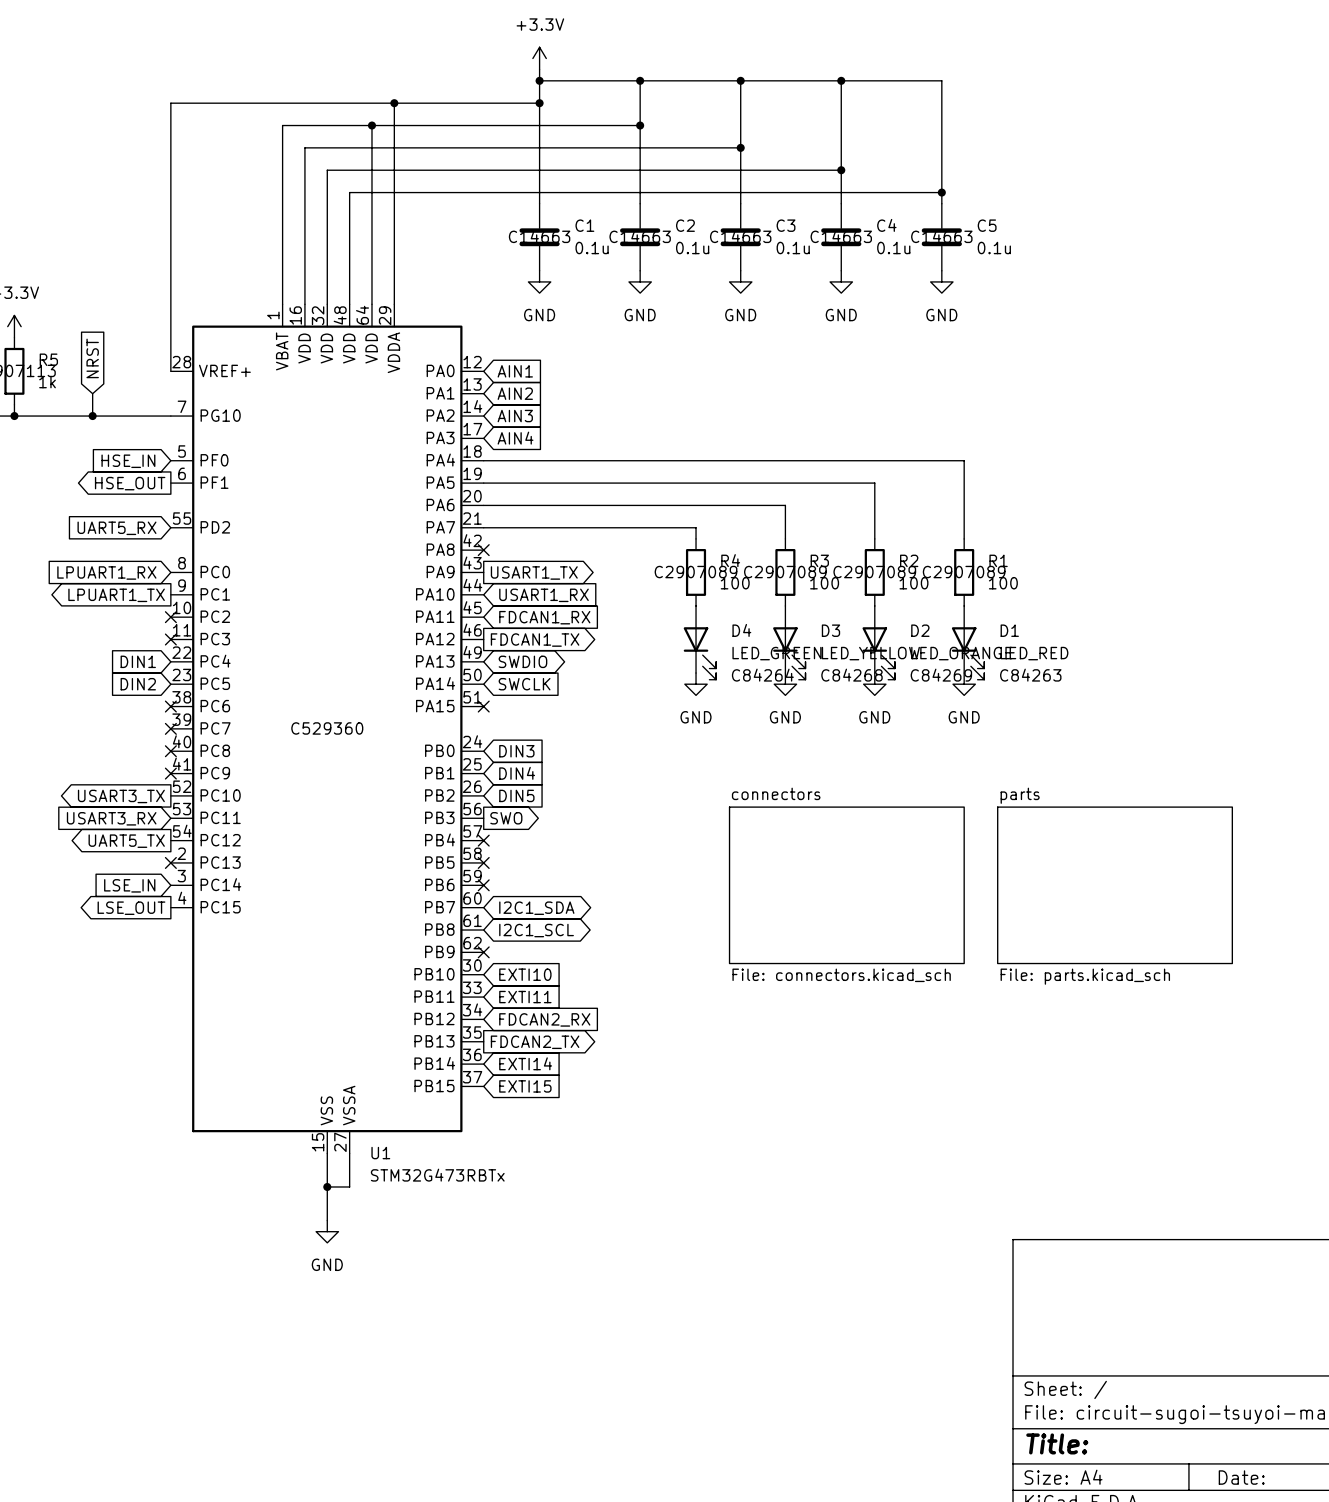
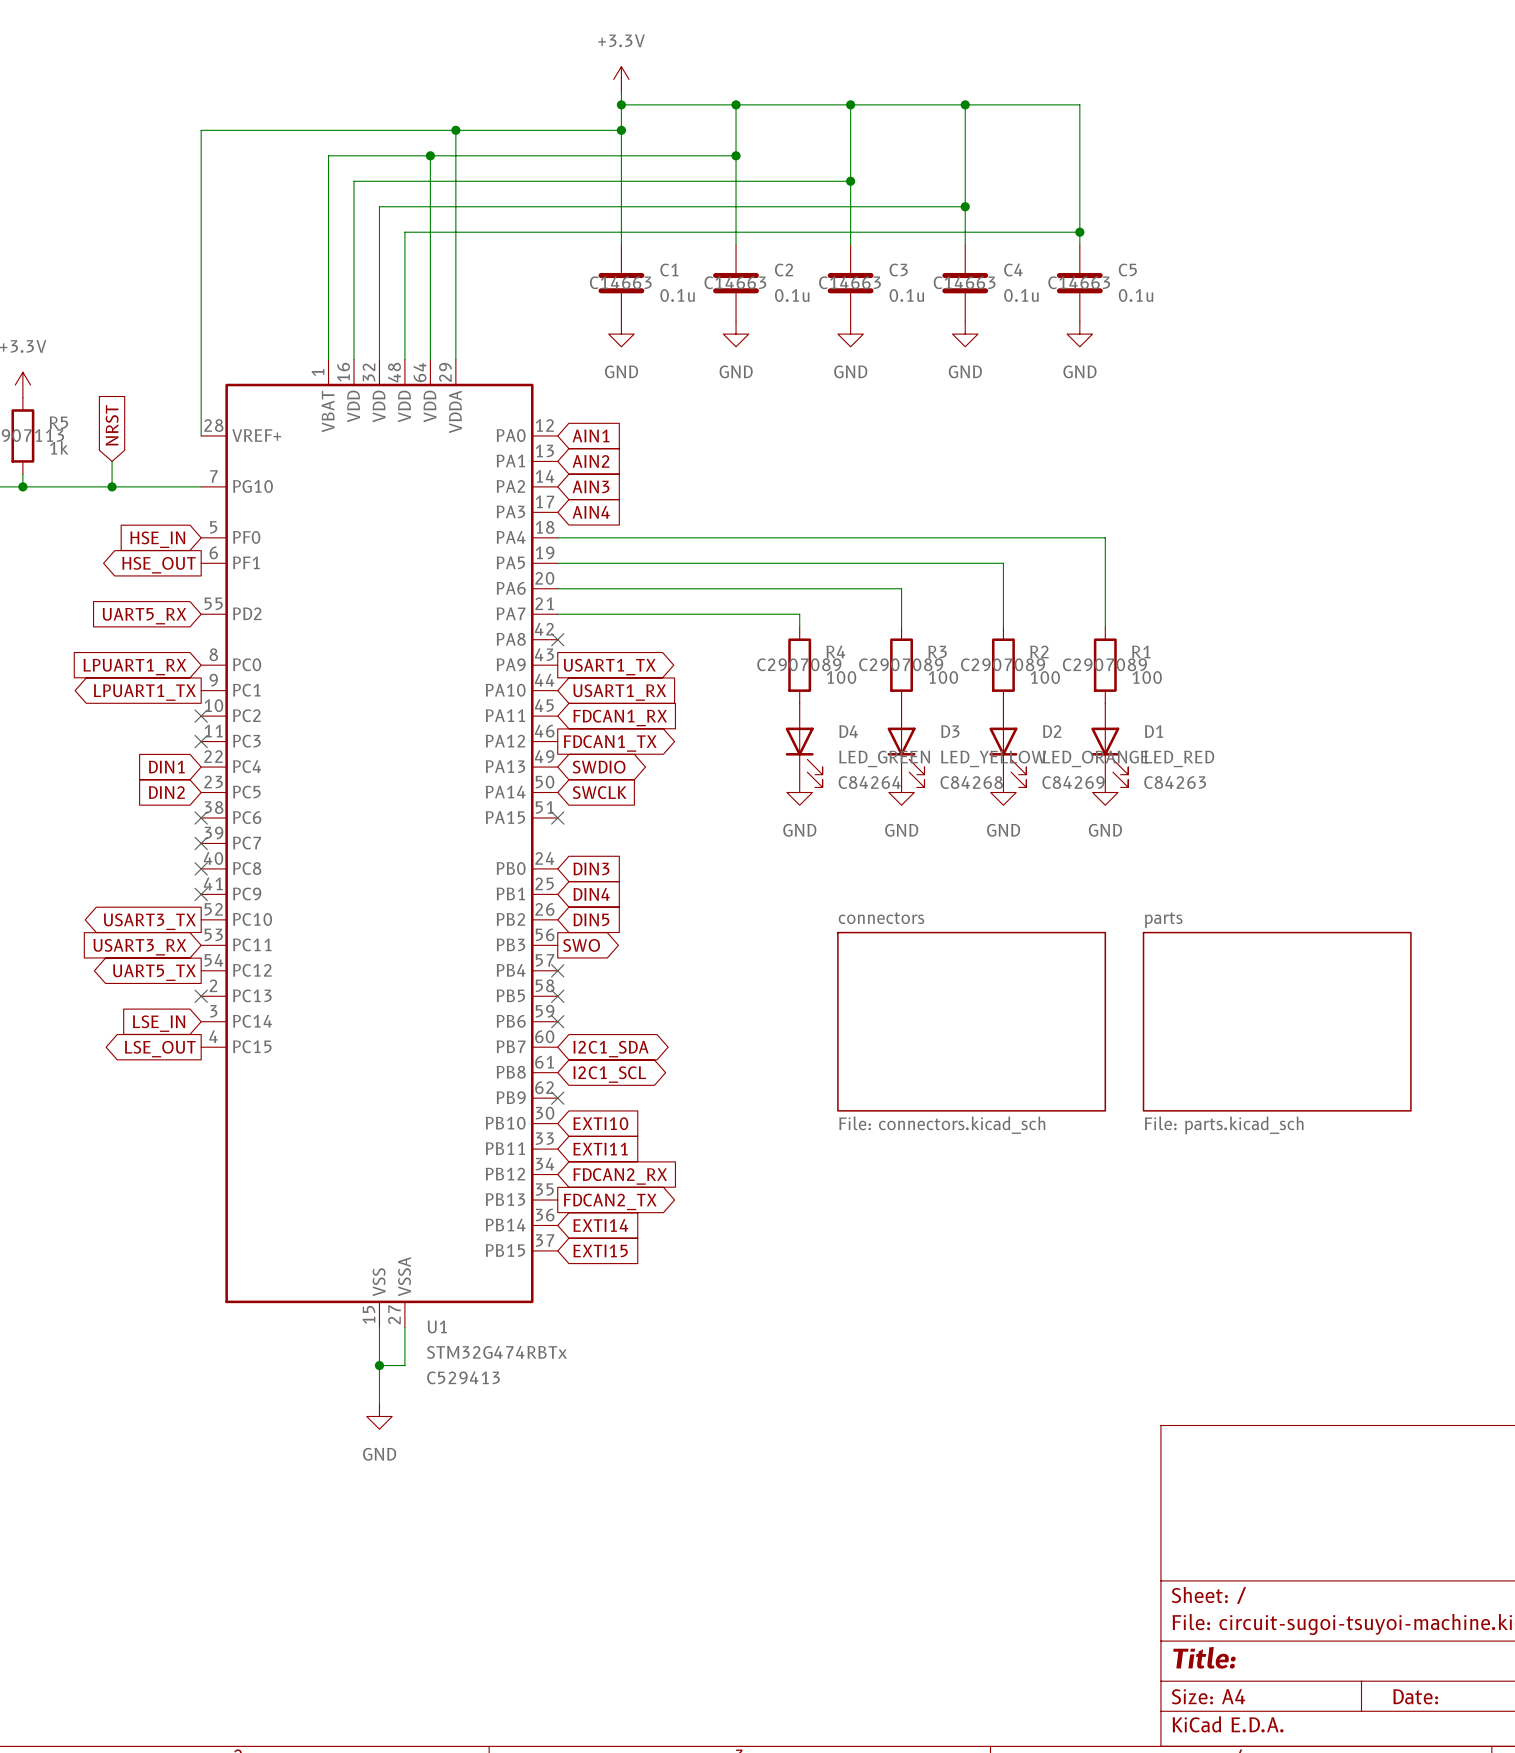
U1 text: C529360 (327, 728) -> C529413 (463, 1377)
U1 value: STM32G473RBTx (437, 1175) -> STM32G474RBTx (497, 1352)

